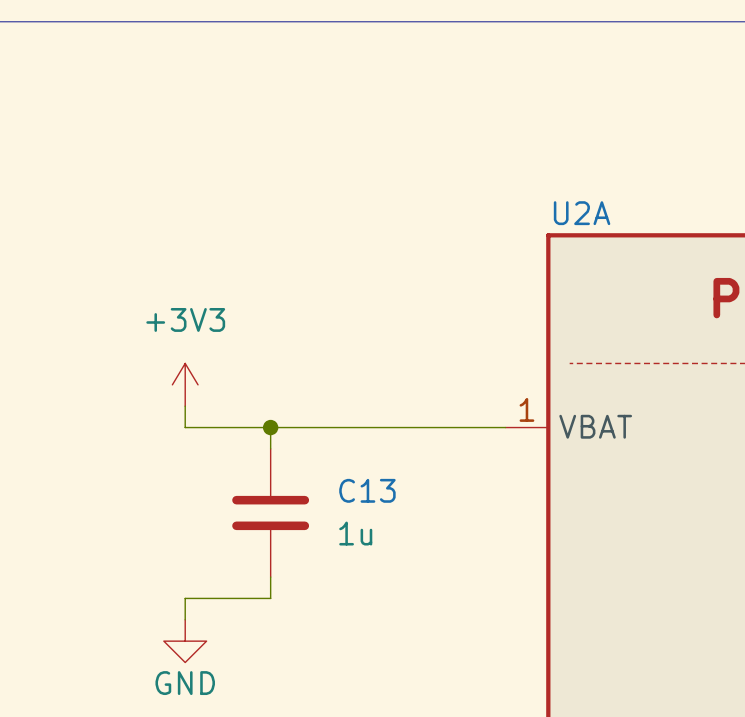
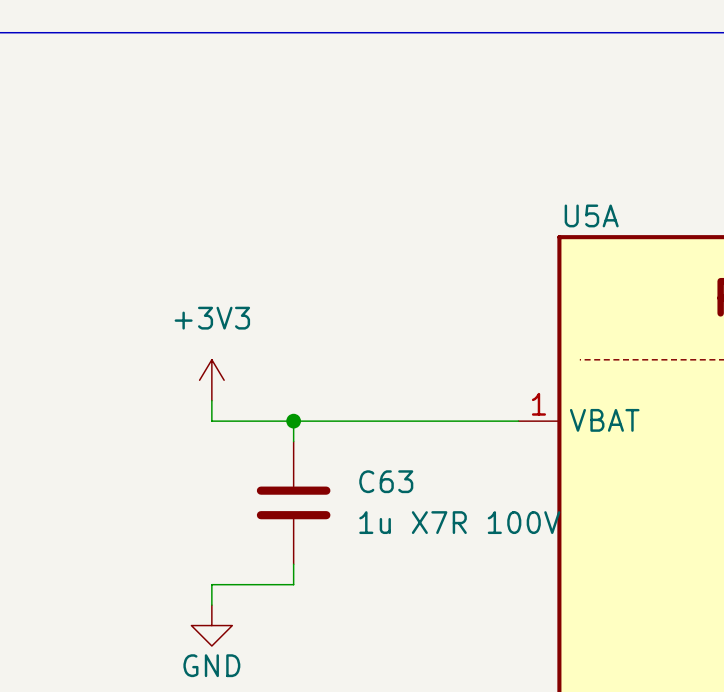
U2A name: U2A (582, 213) -> U5A (591, 215)
C13 name: C13 (367, 490) -> C63 (386, 481)
C13 value: 1u (355, 533) -> 1u X7R 100V (459, 522)

